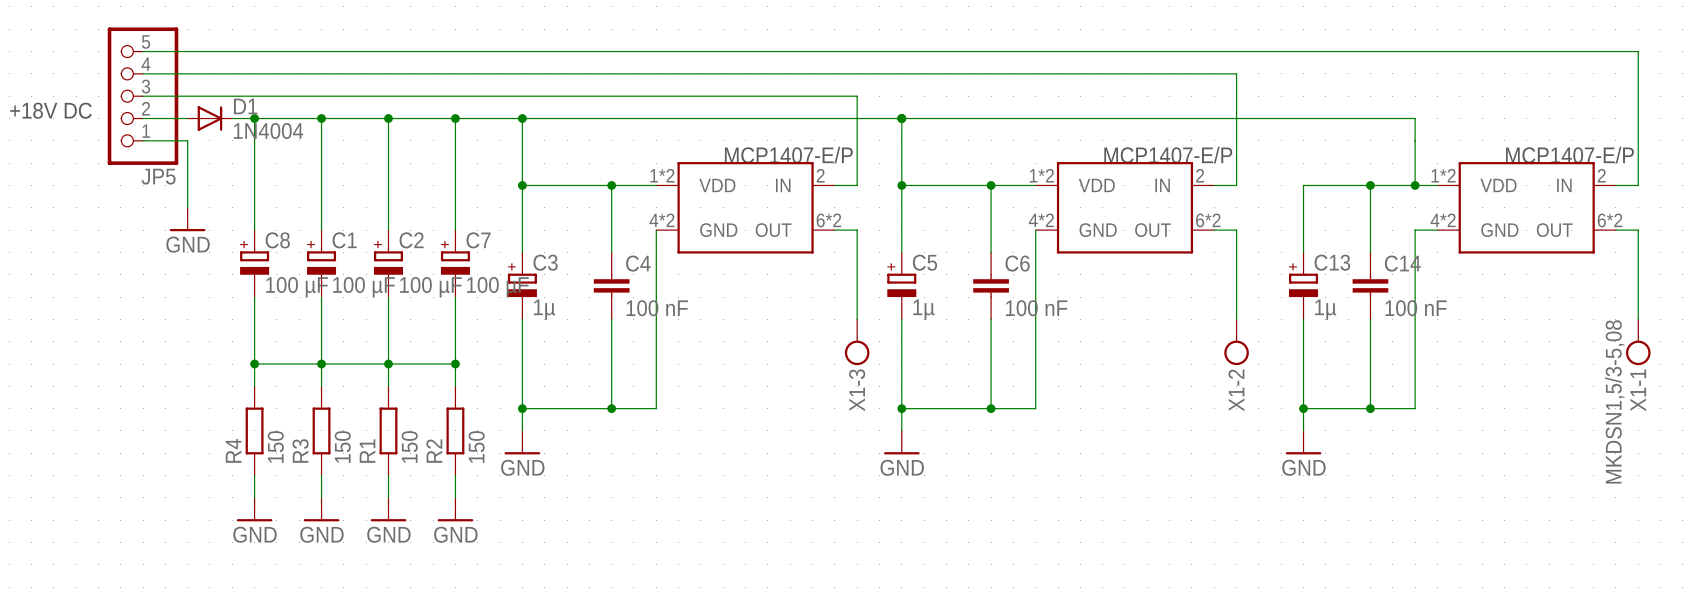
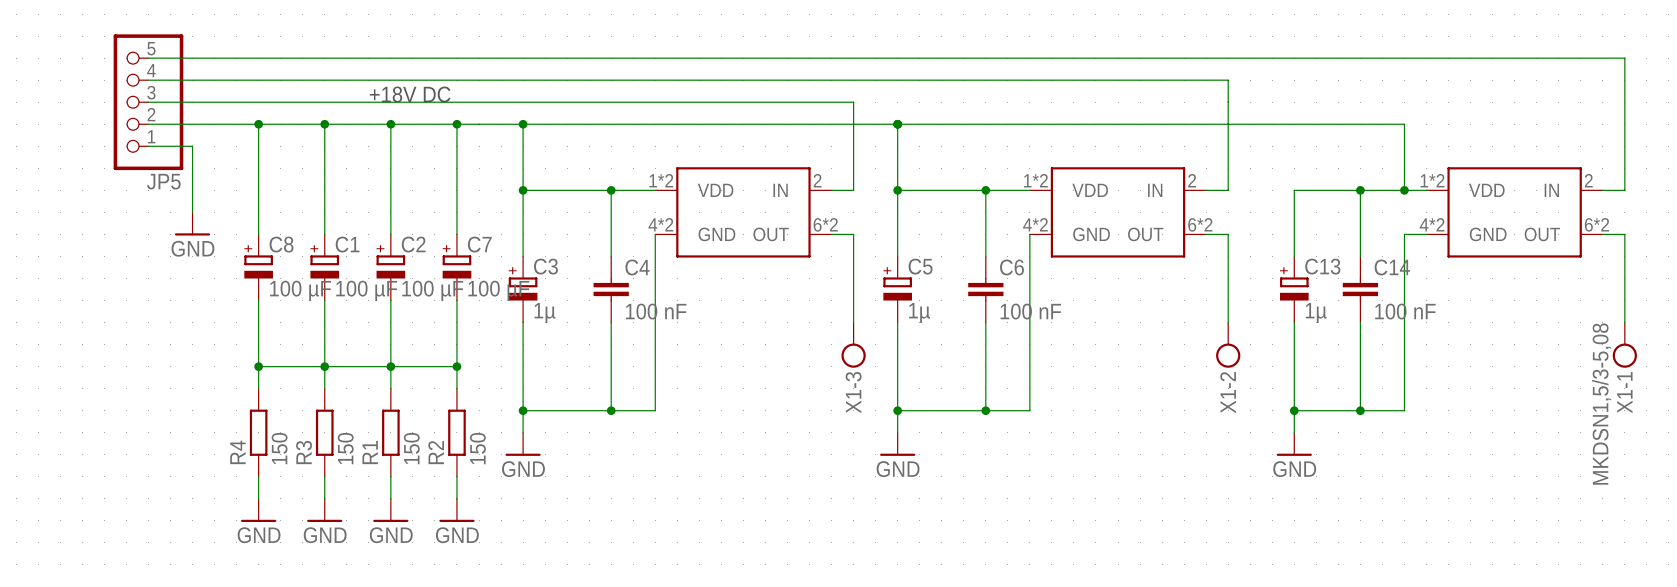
text: none -> +18V DC (410, 94)
text: +18V DC (50, 110) -> none
D1: 1N4004 (209, 118) -> none
text: MCP1407-E/P (788, 155) -> none
text: MCP1407-E/P (1168, 155) -> none
text: MCP1407-E/P (1569, 155) -> none

